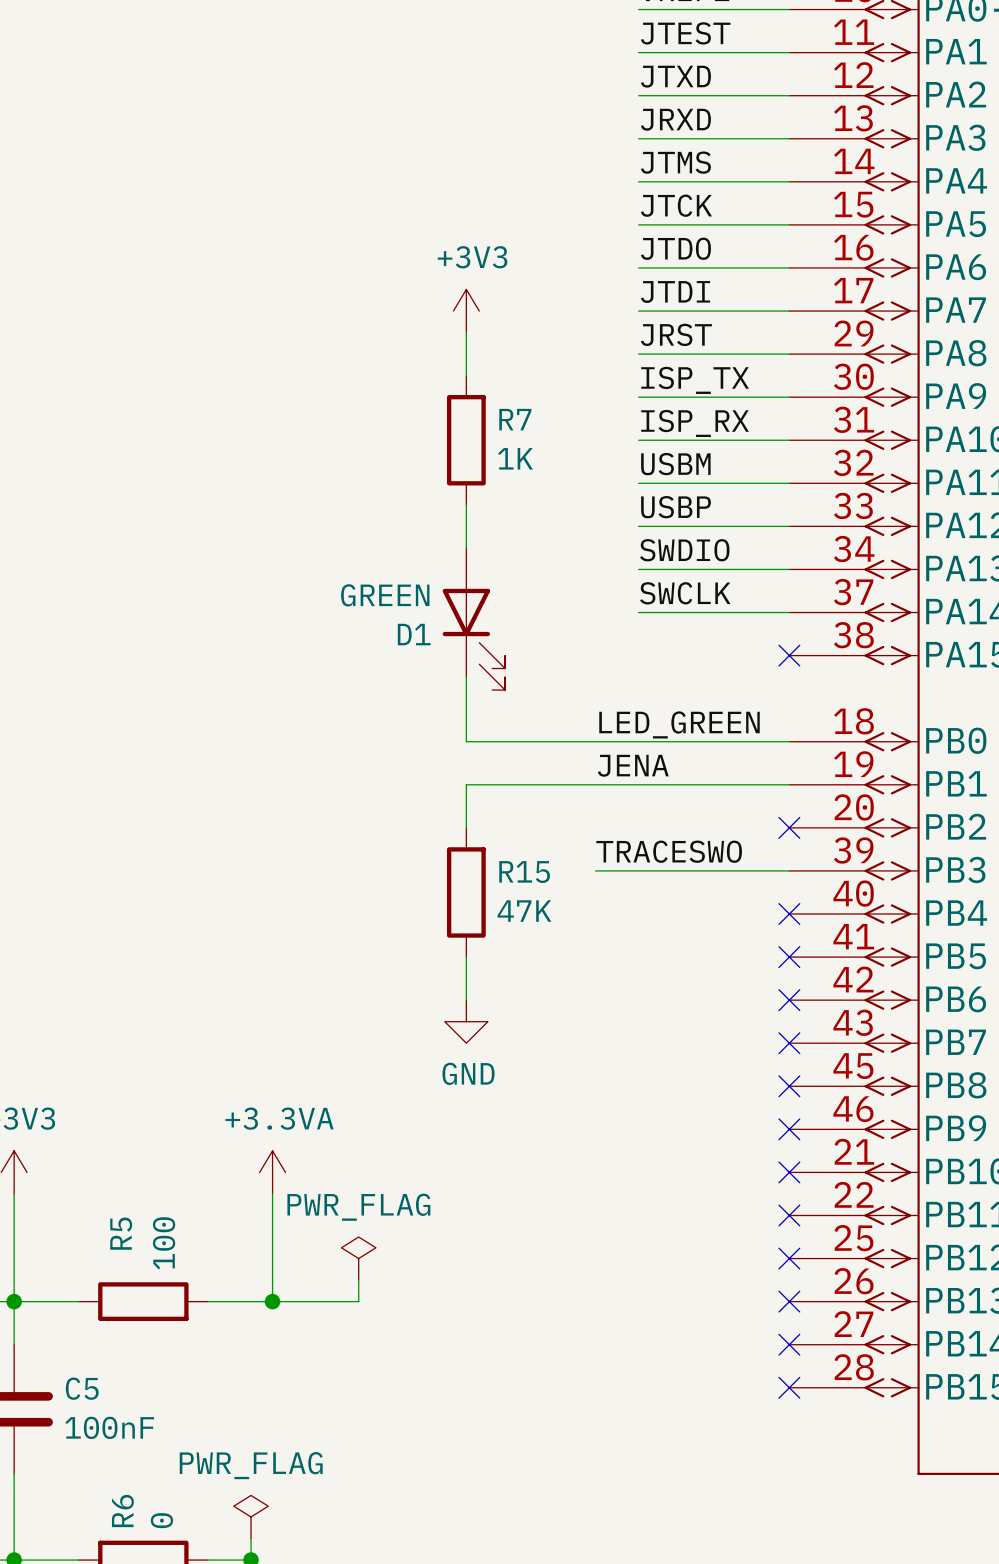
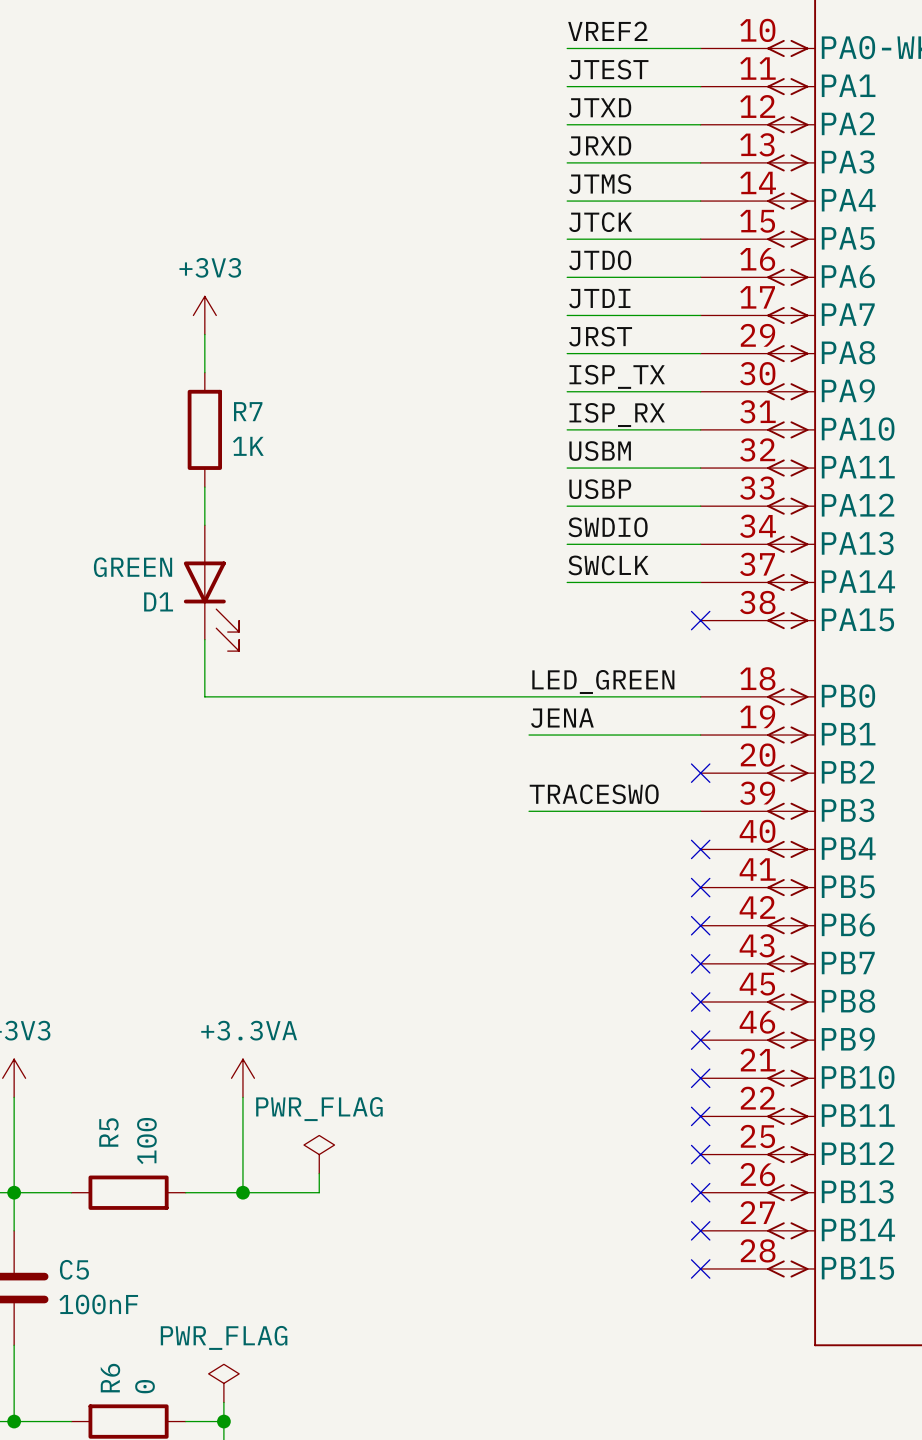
power symbol position: +3V3 (466, 311) -> +3V3 (204, 315)
wire: (466, 332) (466, 375) -> (204, 334) (204, 372)
R7 position: (466, 440) -> (204, 429)
wire: (466, 504) (466, 547) -> (204, 487) (204, 525)
D1 position: (473, 618) -> (211, 588)
wire: (466, 677) (466, 741) -> (204, 639) (204, 696) (414, 696)
wire: (595, 784) (466, 784) (466, 827) -> none
R15: 47K (466, 892) -> none
wire: (466, 957) (466, 1000) -> none
power symbol: GND (466, 1021) -> none

